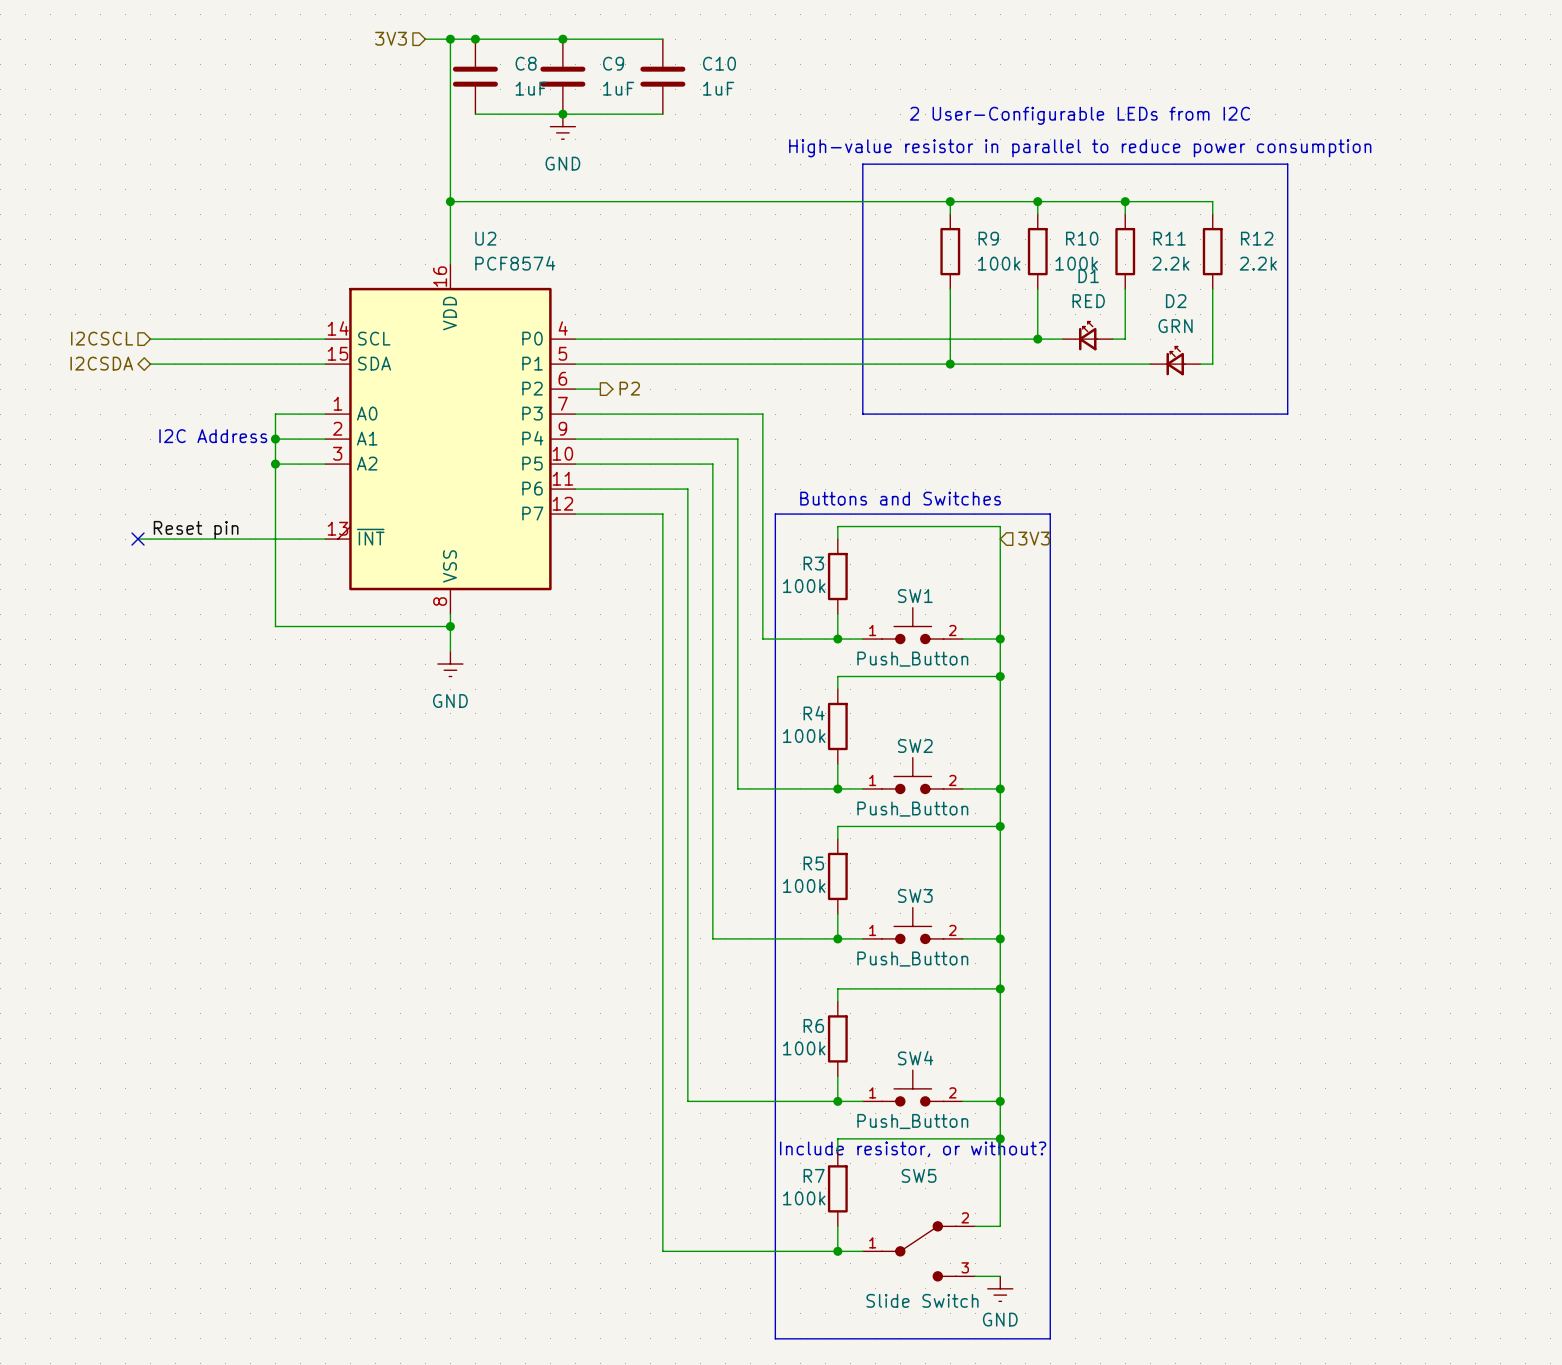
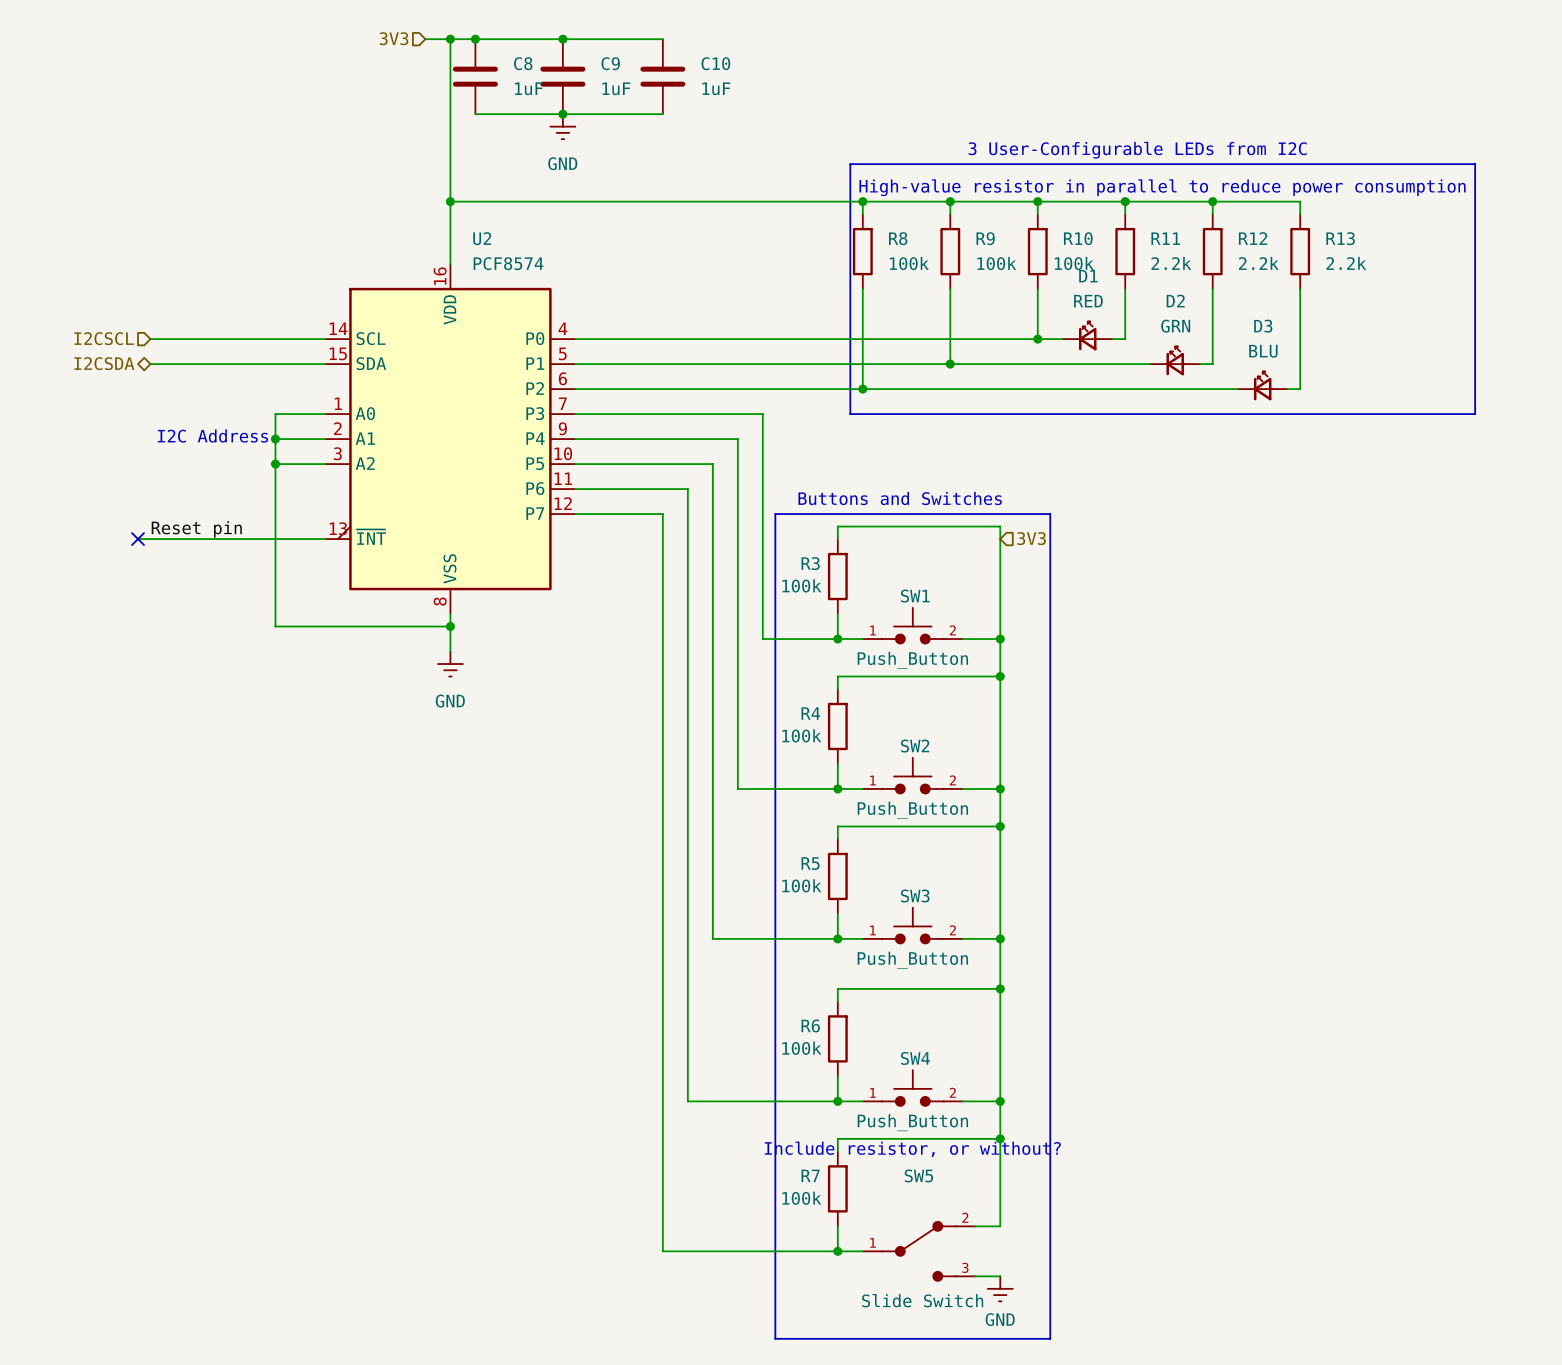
text: 2 User-Configurable LEDs from I2C (1079, 115) -> none
text position: High-value resistor in parallel to reduce power consumption (1080, 148) -> High-value resistor in parallel to reduce power consumption (1162, 187)
text: none -> 3 User-Configurable LEDs from I2C (1137, 150)
line: (862, 164) (862, 414) -> (862, 164) (850, 164) (850, 414) (862, 414)
line: (1287, 164) (1287, 414) -> (1287, 164) (1475, 164) (1475, 414) (1287, 414)
junction: none -> (862, 201)
wire: none -> (1212, 201) (1300, 201) (1300, 214)
junction: none -> (1212, 201)
R8: none -> 100k (862, 251)
R13: none -> 2.2k (1300, 251)
wire: none -> (1300, 289) (1300, 389) (1287, 389)
D3: none -> BLU (1262, 385)
hierarchical label: P2 (629, 388) -> none
wire: none -> (600, 389) (1237, 389)
junction: none -> (862, 389)

